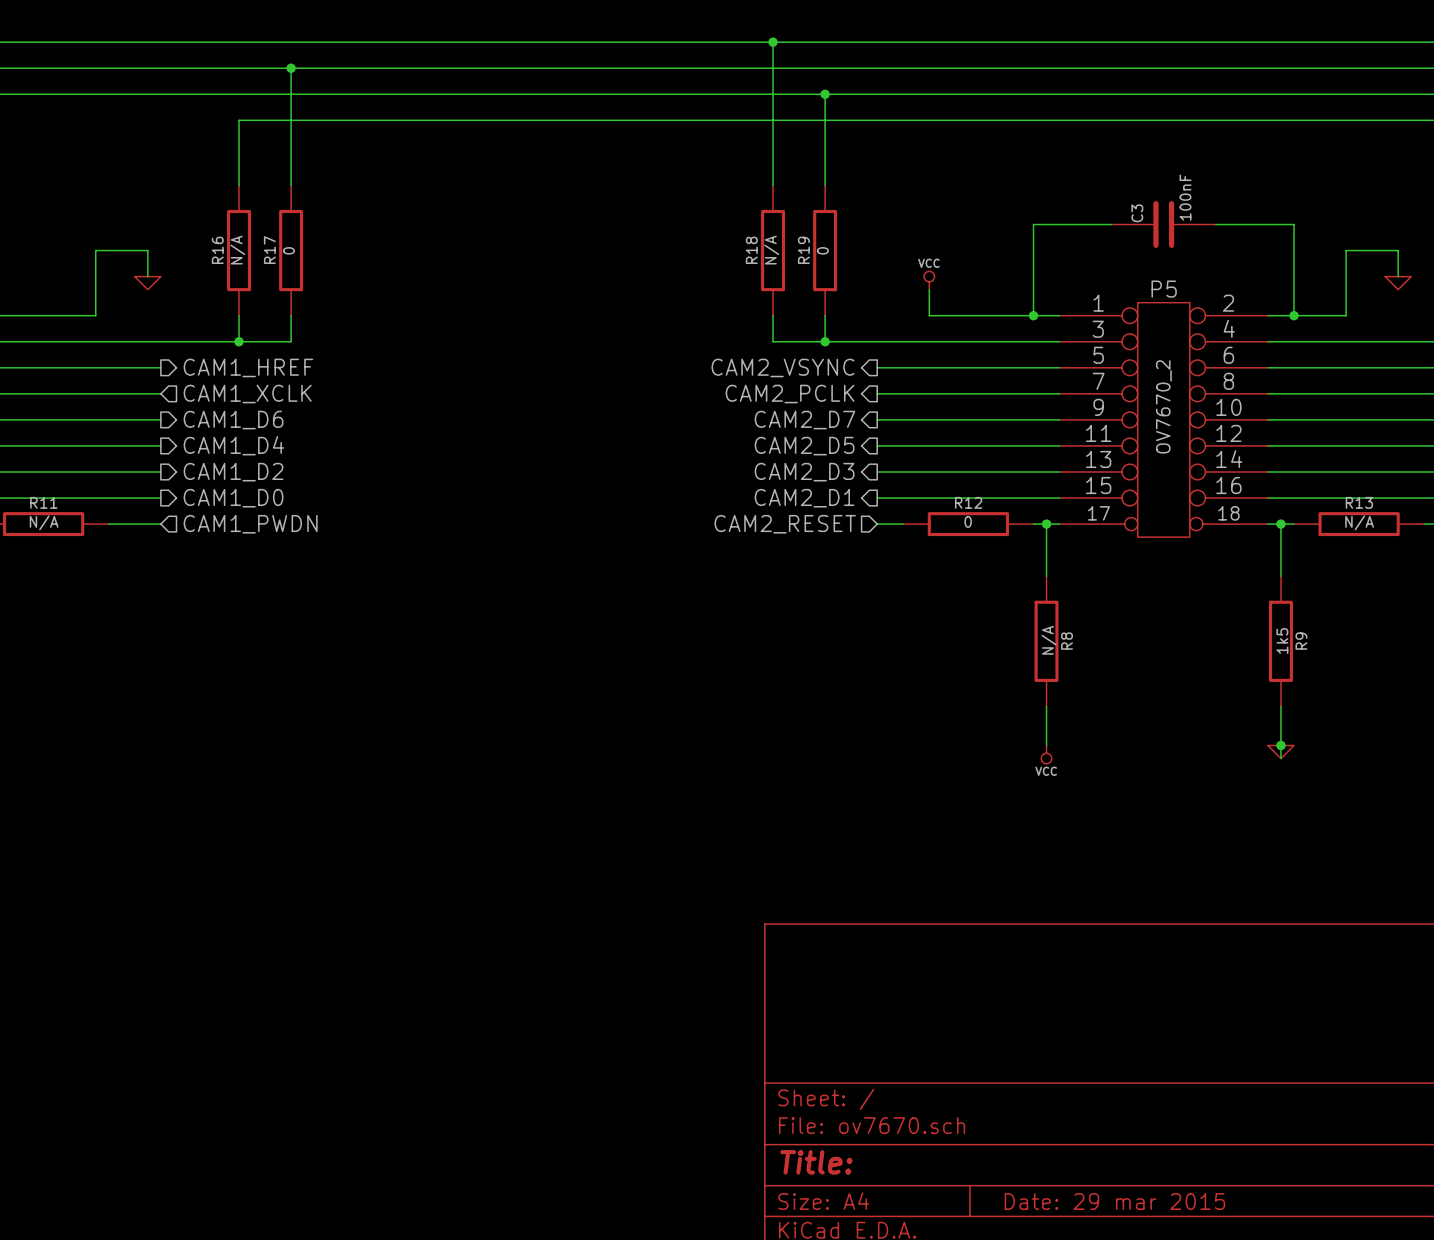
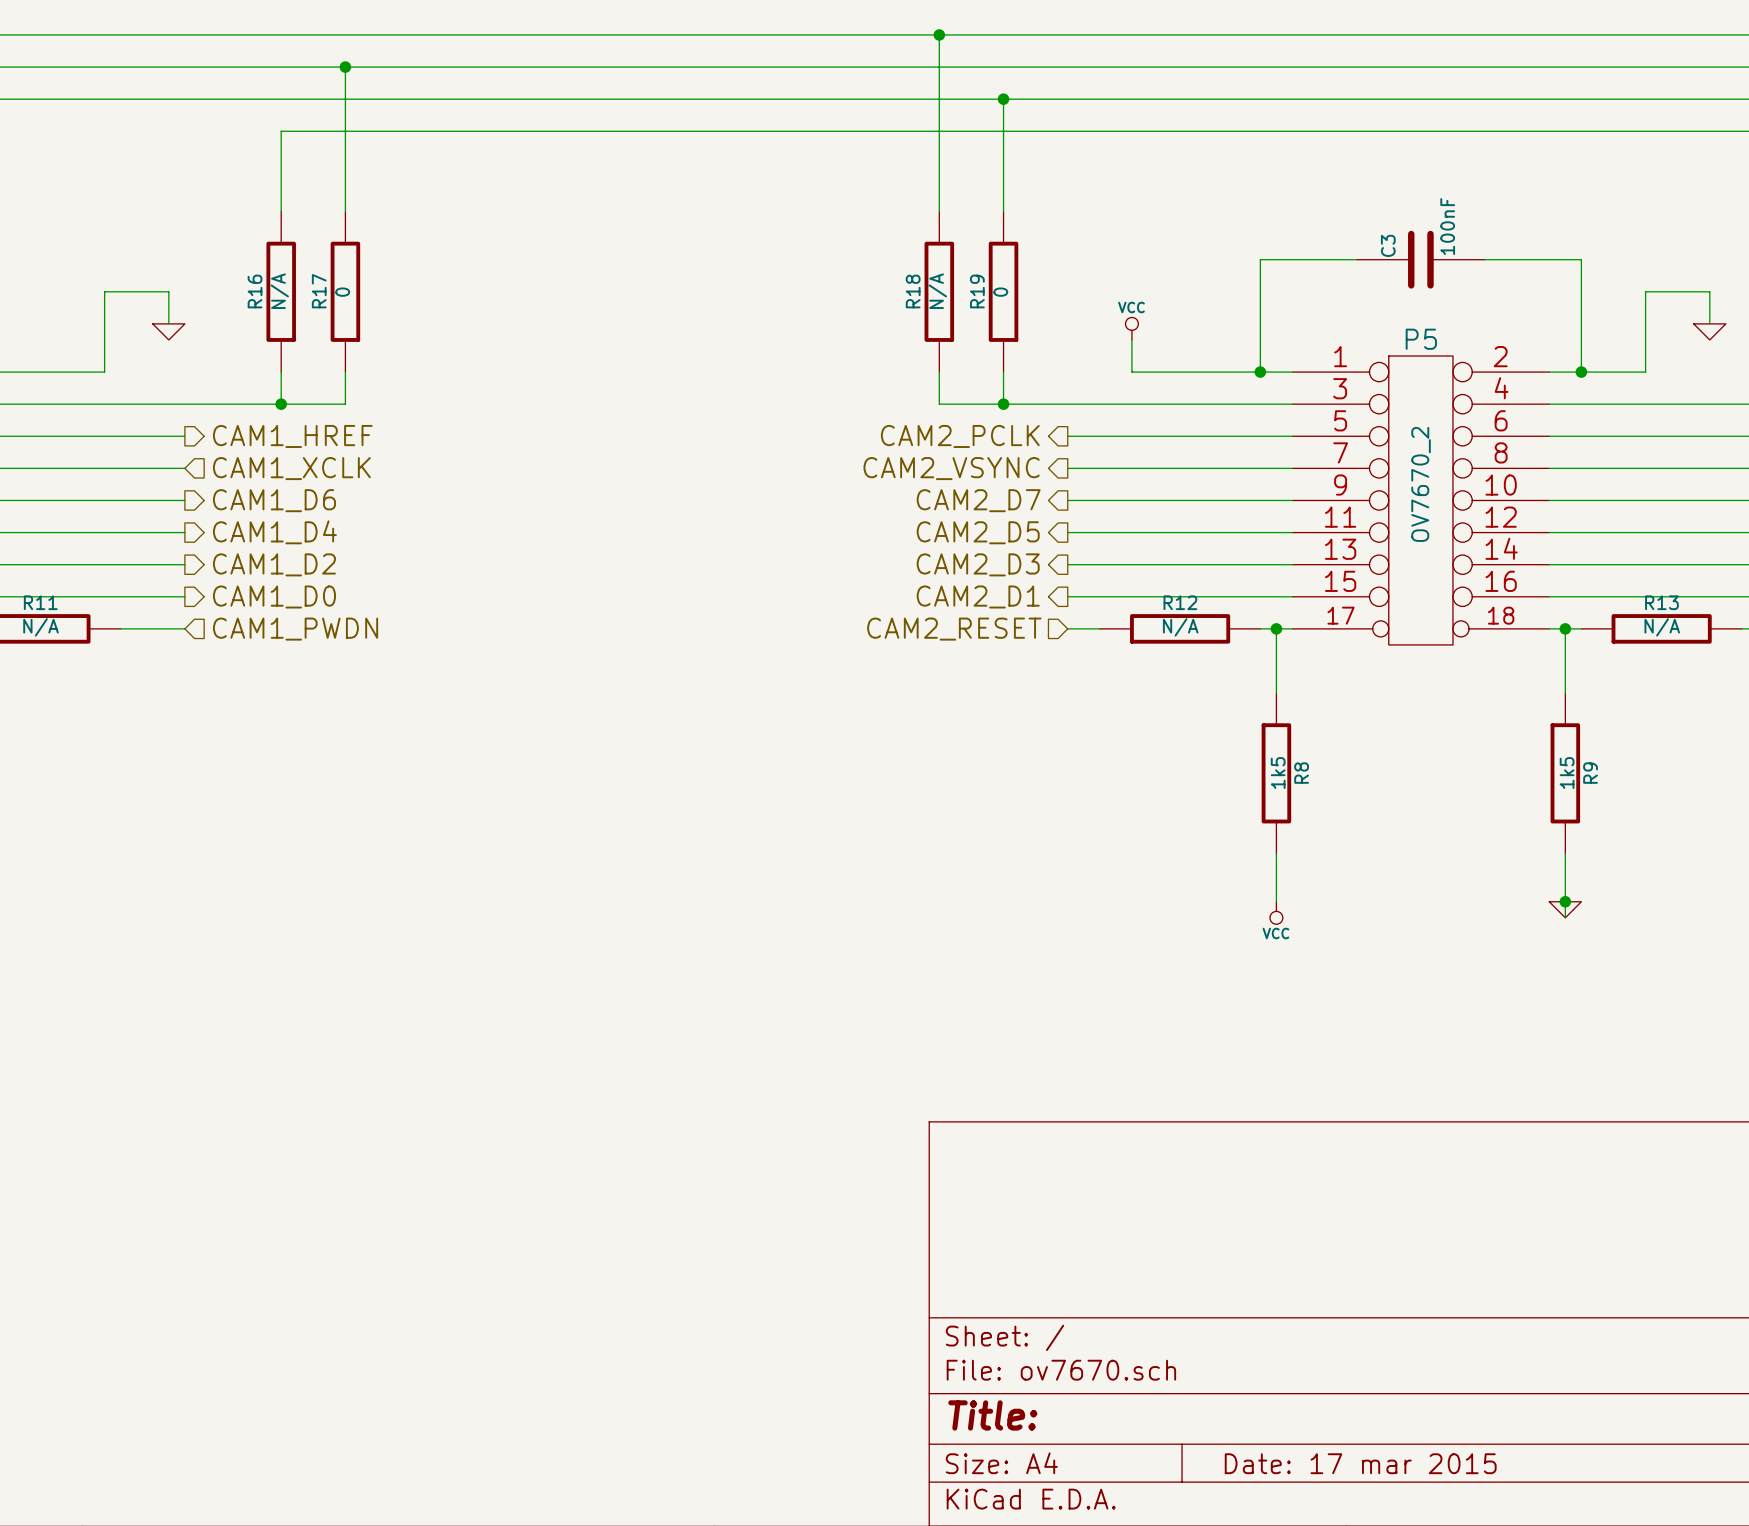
hierarchical label: CAM2_VSYNC (782, 367) -> CAM2_PCLK (960, 436)
hierarchical label: CAM2_PCLK (790, 394) -> CAM2_VSYNC (951, 468)
R12 value: 0 (968, 521) -> N/A (1180, 627)
R8 value: N/A (1048, 640) -> 1k5 (1278, 773)
title block: Date: 29 mar 2015 (1114, 1201) -> Date: 17 mar 2015 (1360, 1463)

